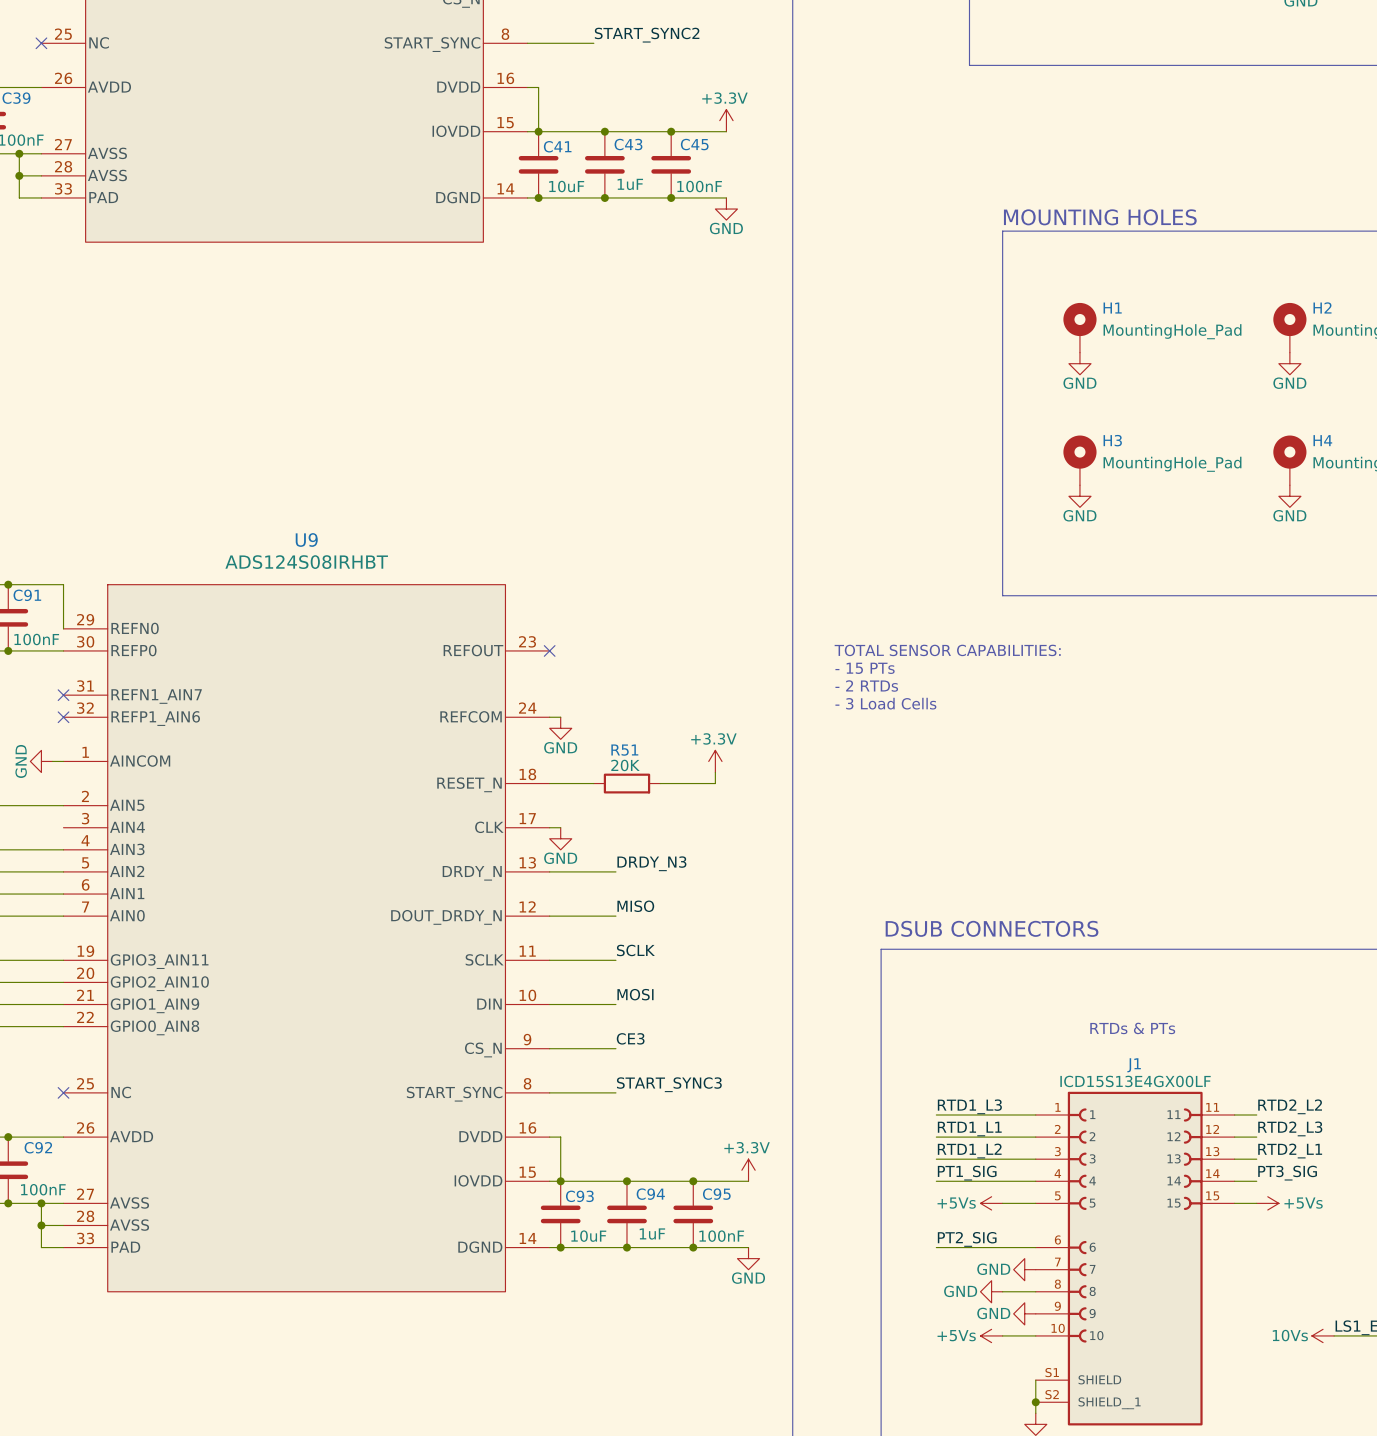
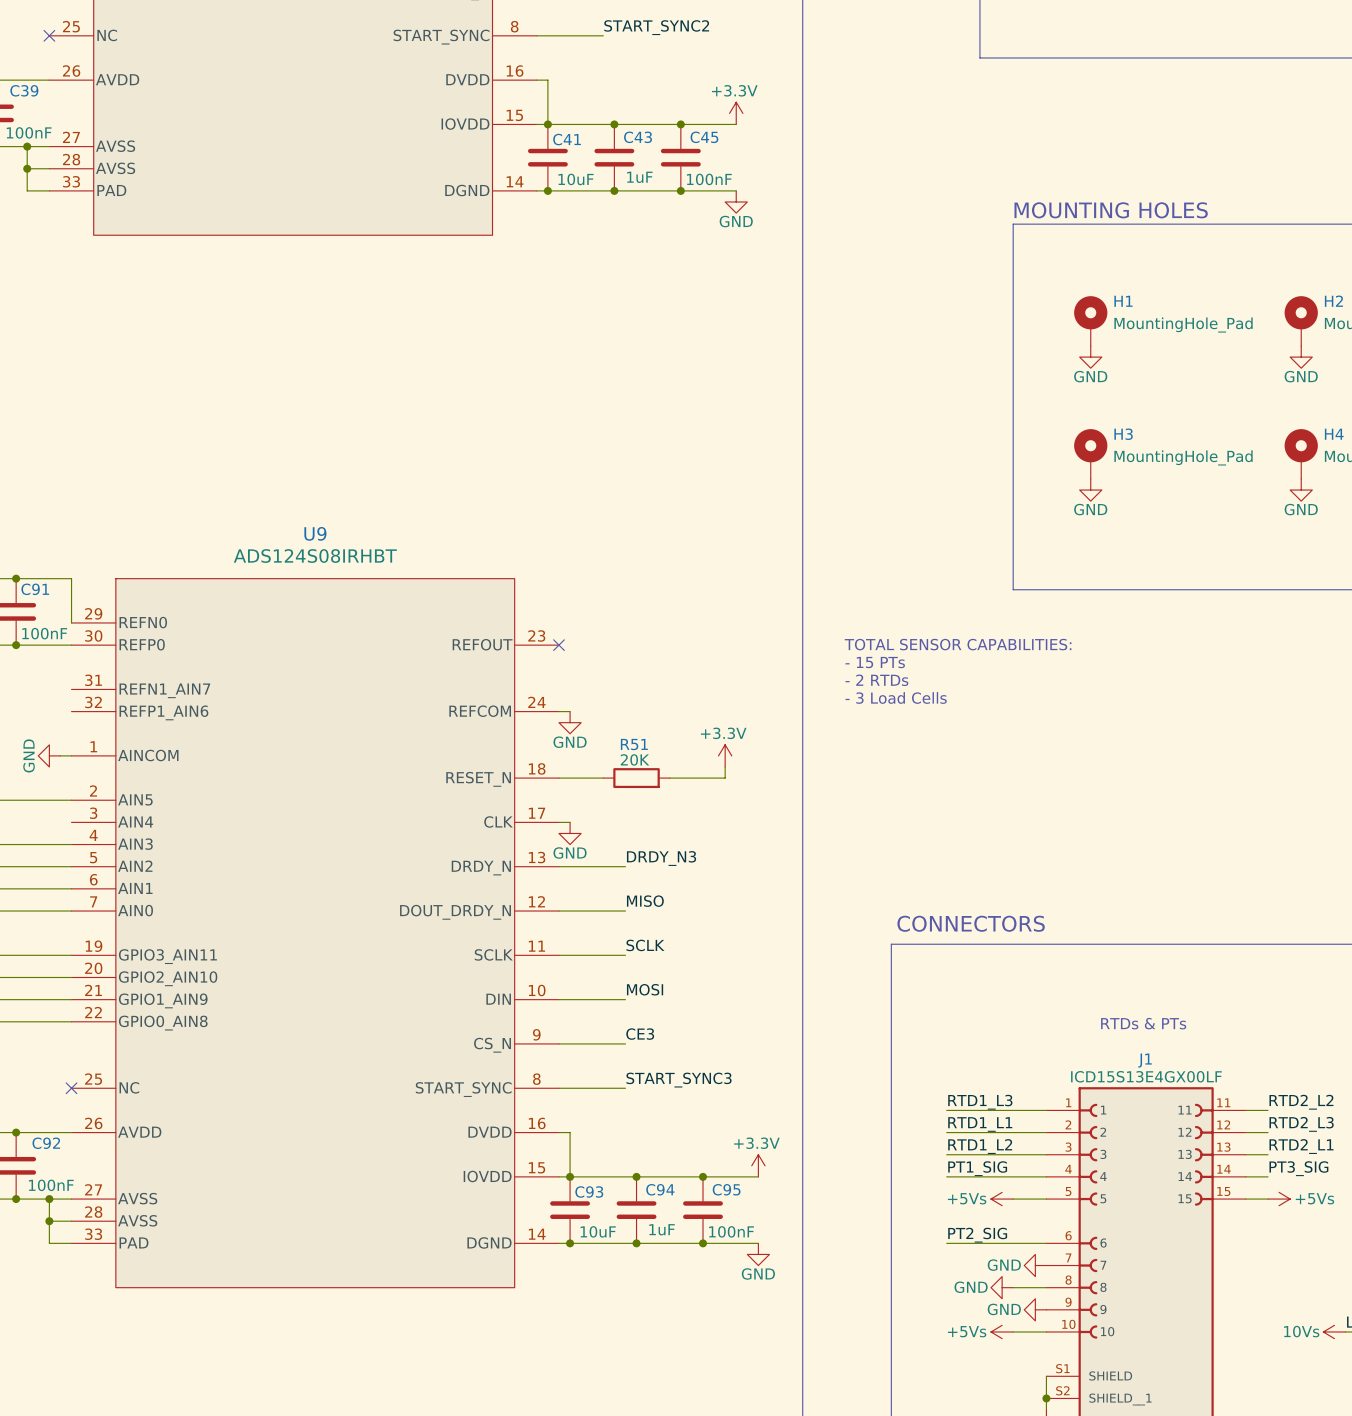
no-connect mark: (63, 695) -> none
no-connect mark: (63, 717) -> none
text: DSUB CONNECTORS (992, 928) -> CONNECTORS (971, 923)

